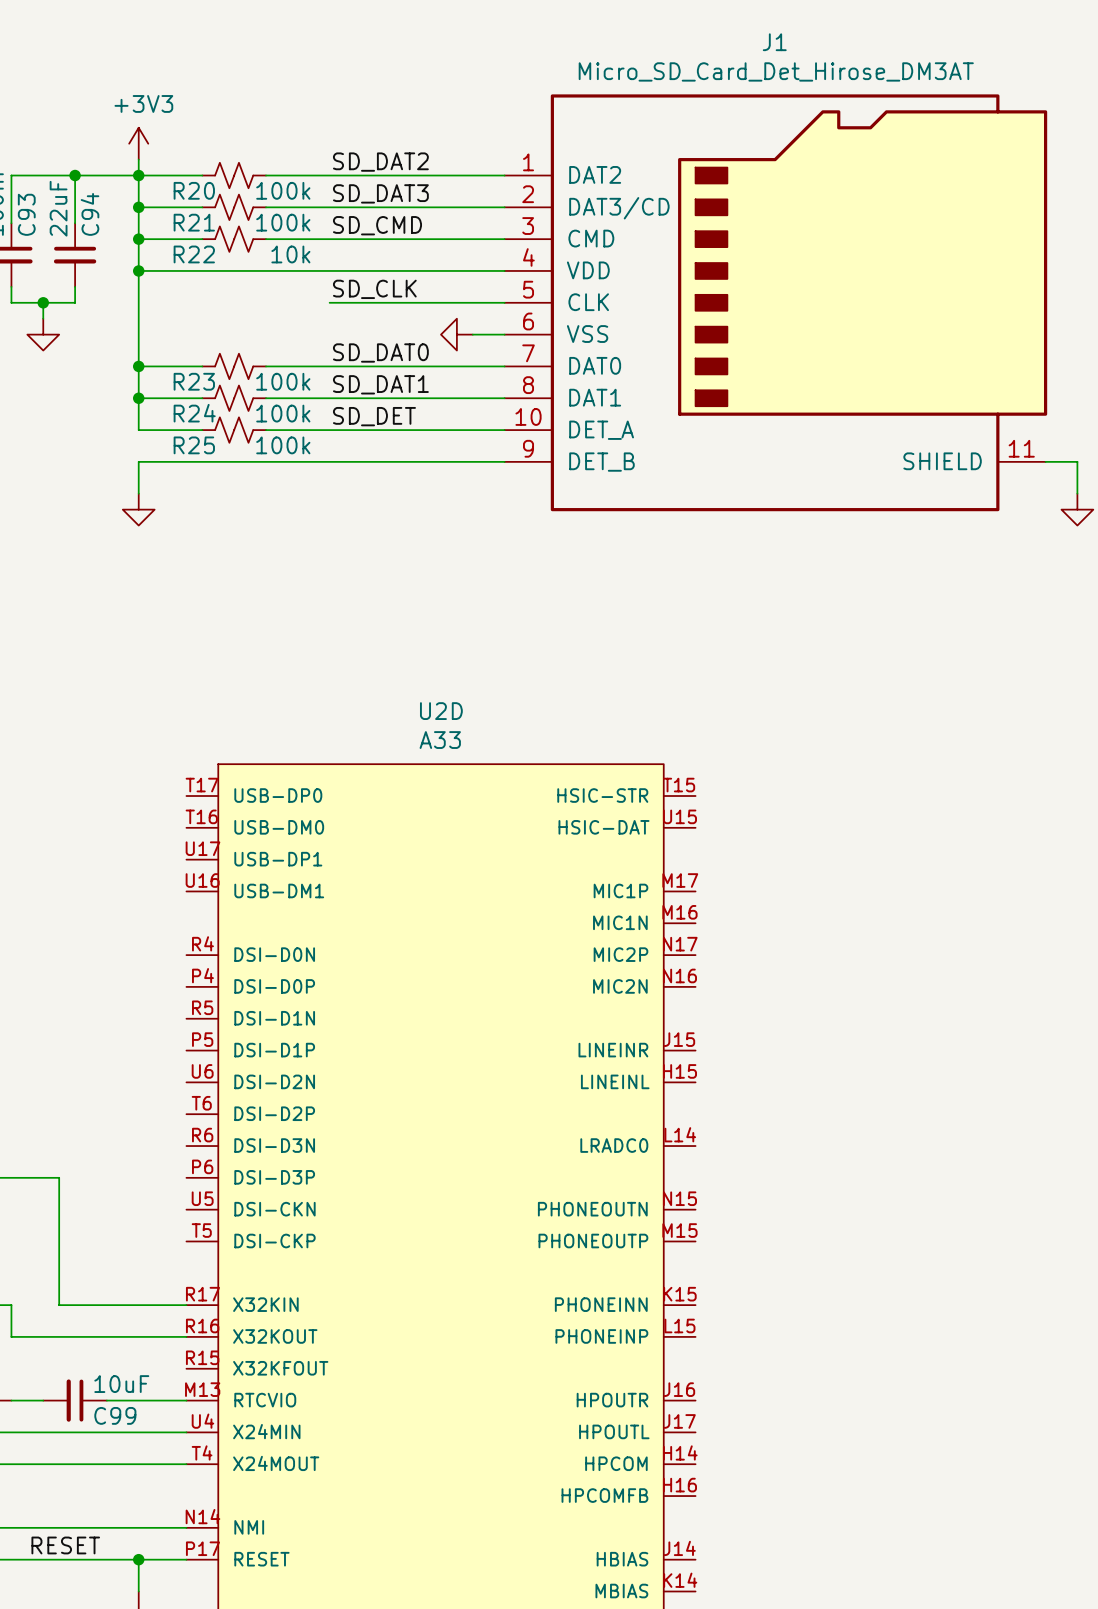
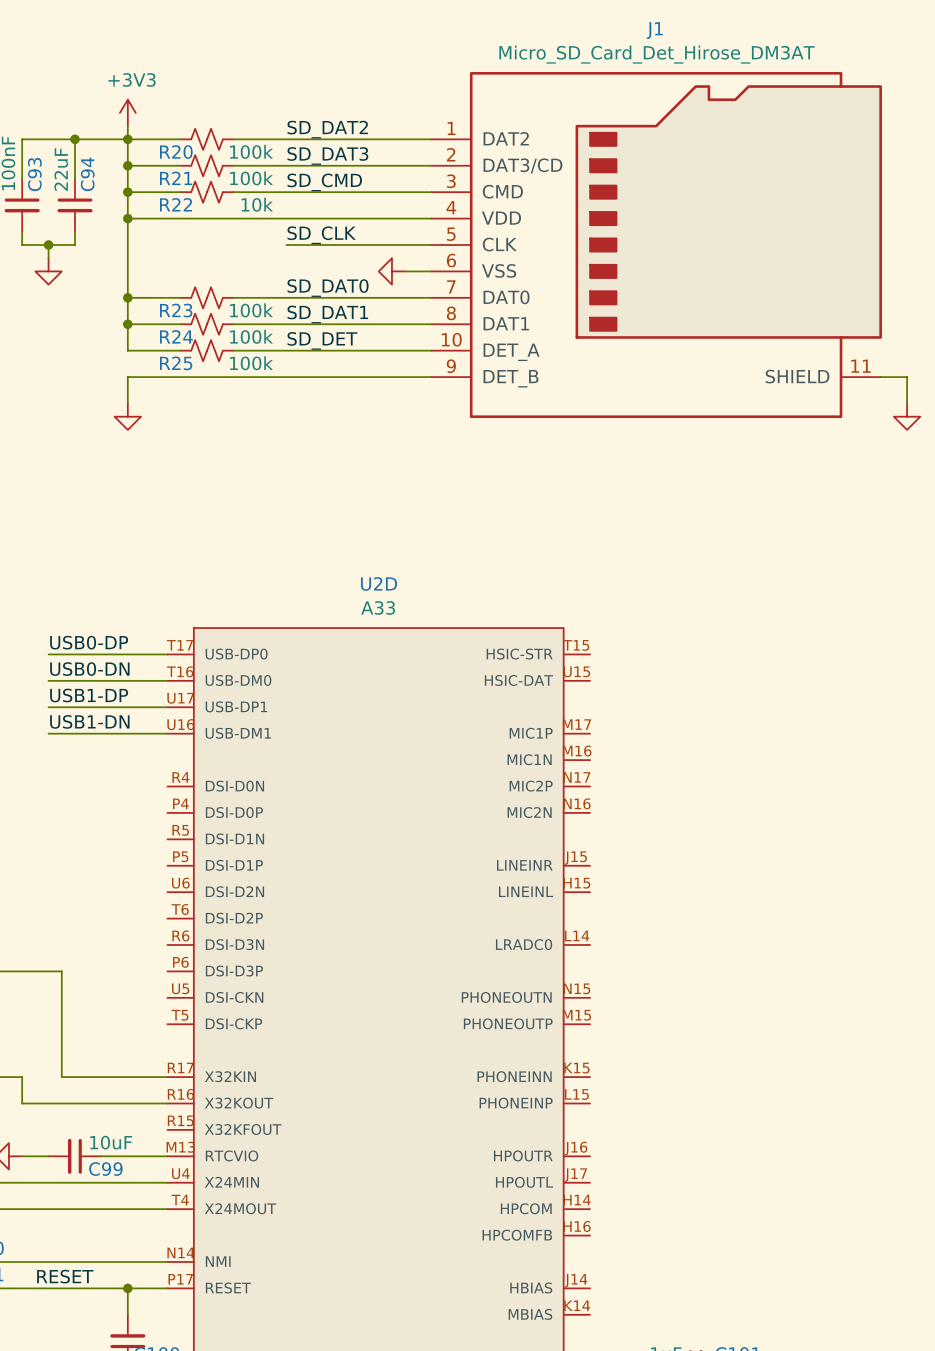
label: none -> USB0-DP (89, 642)
wire: none -> (48, 654) (167, 654)
label: none -> USB0-DN (89, 669)
wire: none -> (48, 680) (167, 680)
label: none -> USB1-DP (89, 695)
wire: none -> (48, 707) (167, 707)
label: none -> USB1-DN (89, 721)
wire: none -> (48, 733) (167, 733)

